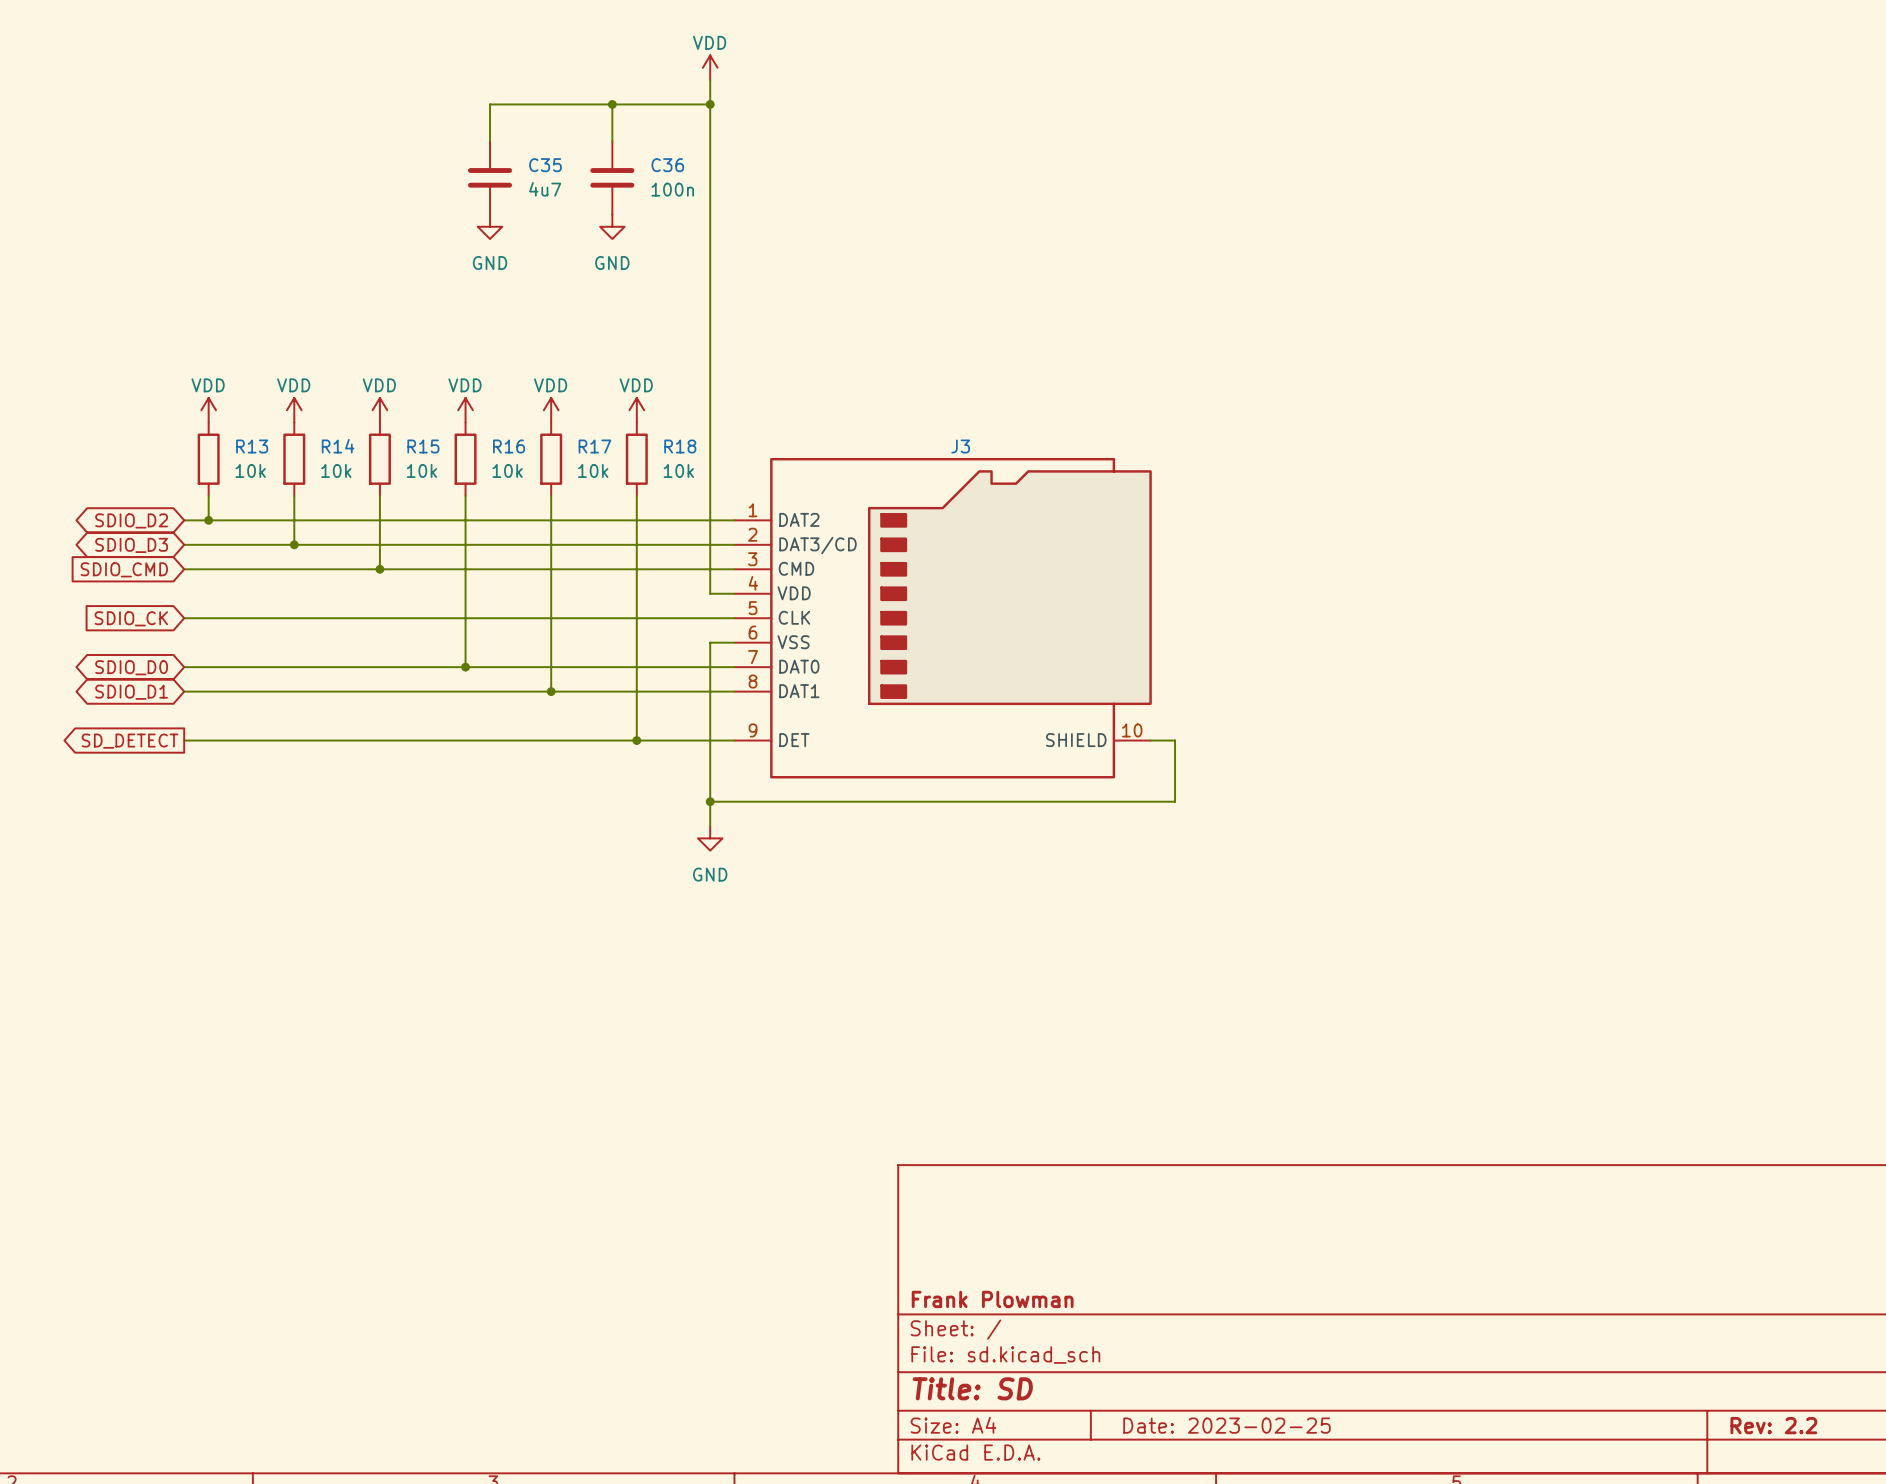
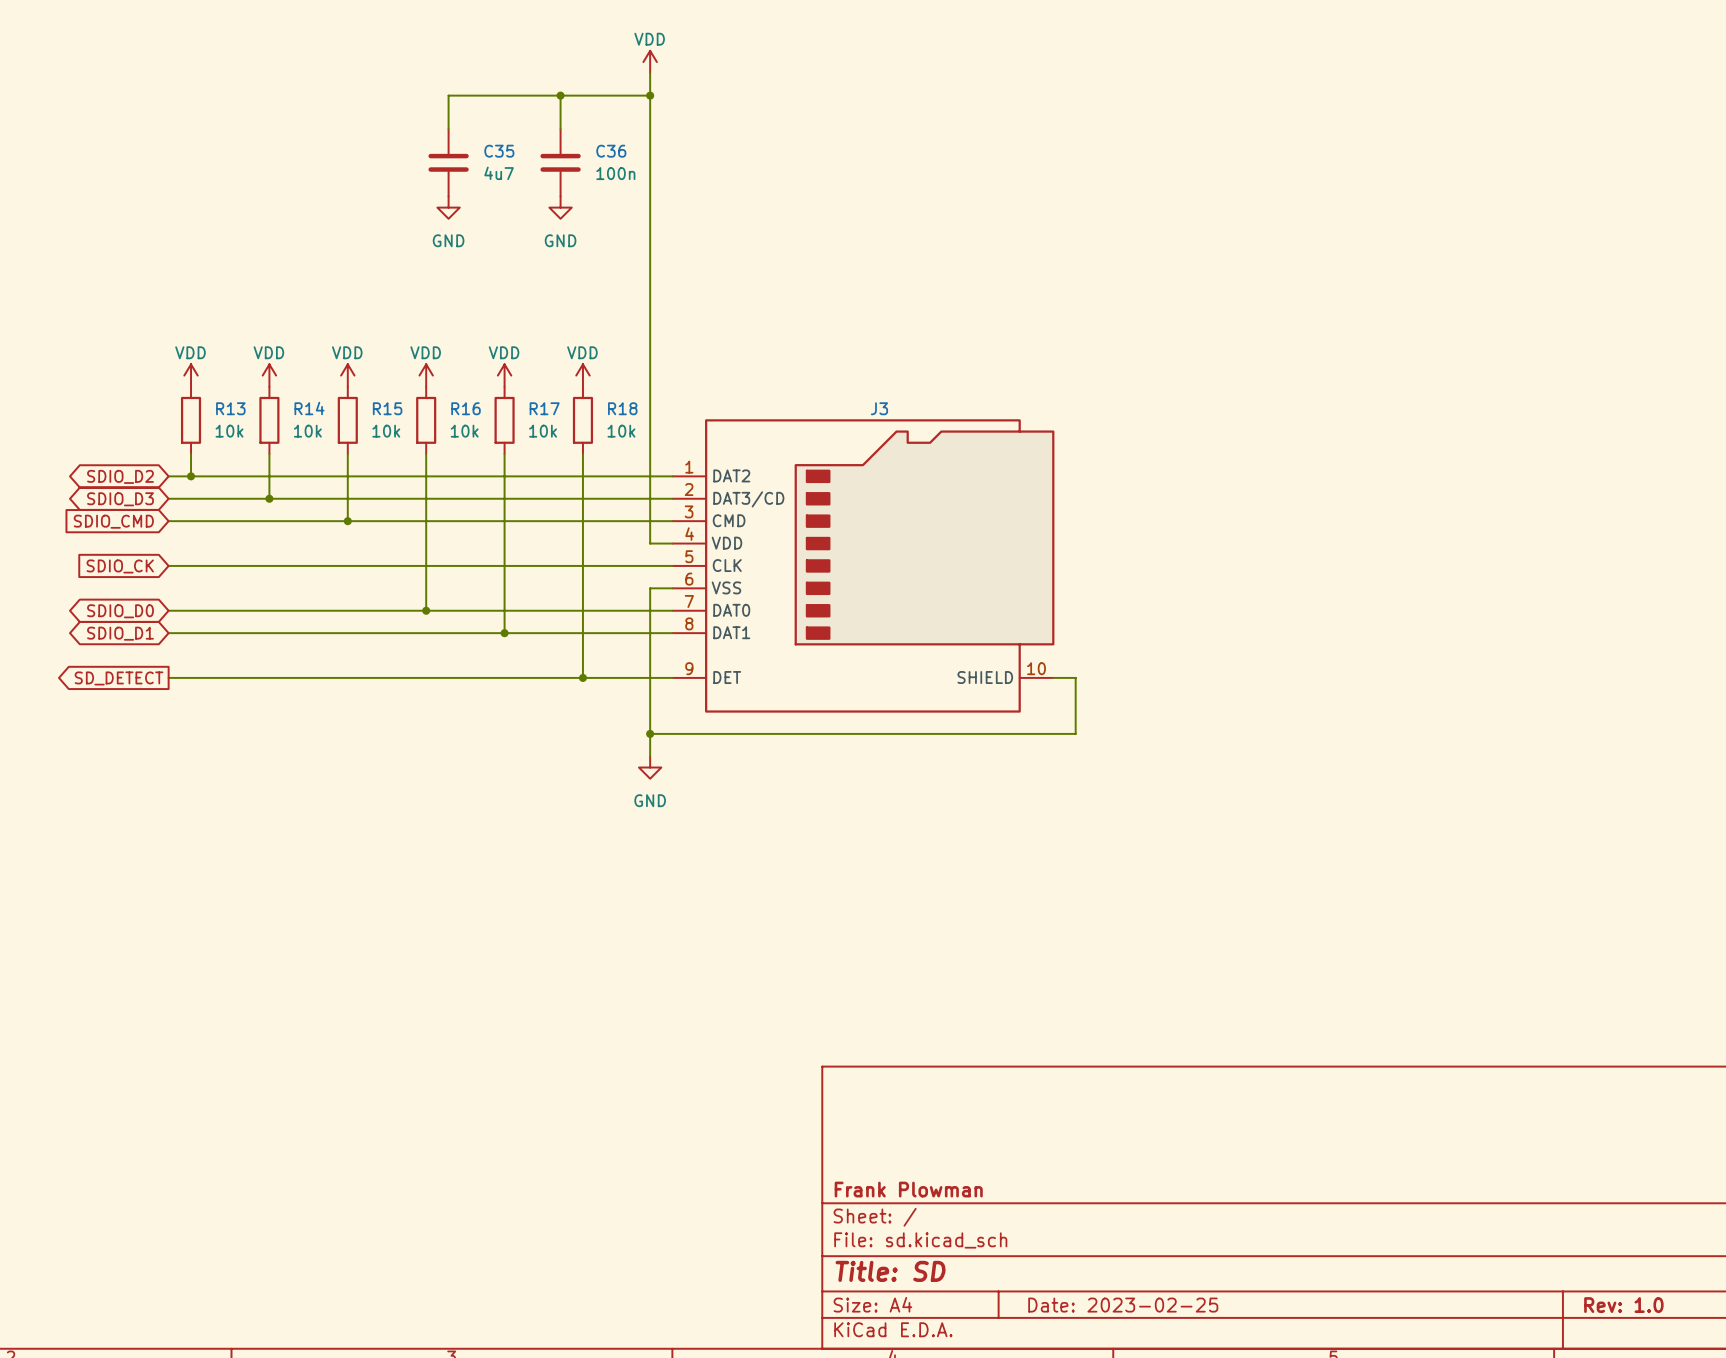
title block: Rev: 2.2 (1773, 1425) -> Rev: 1.0 (1623, 1305)

